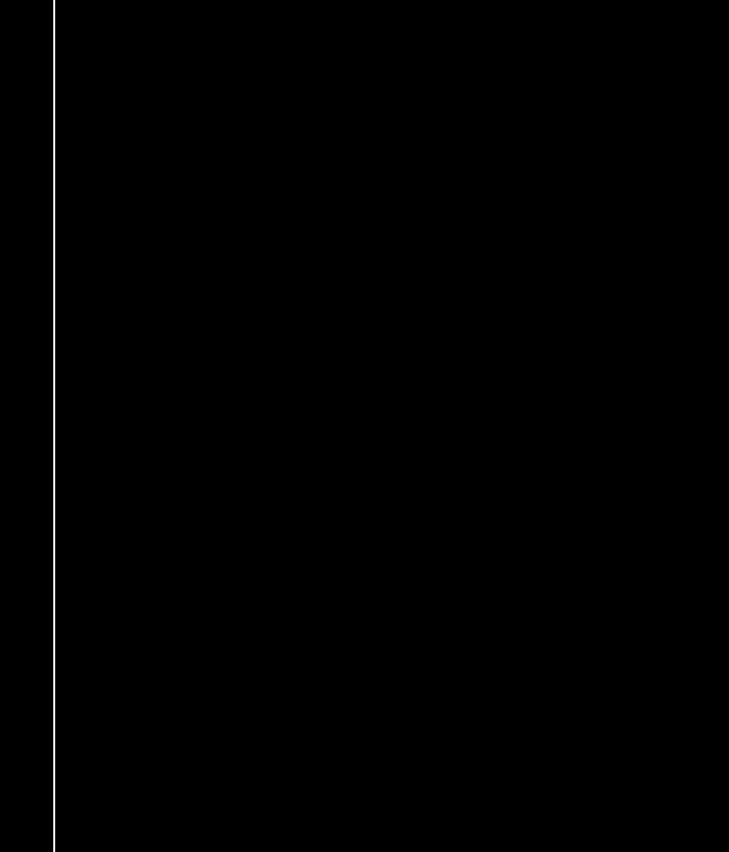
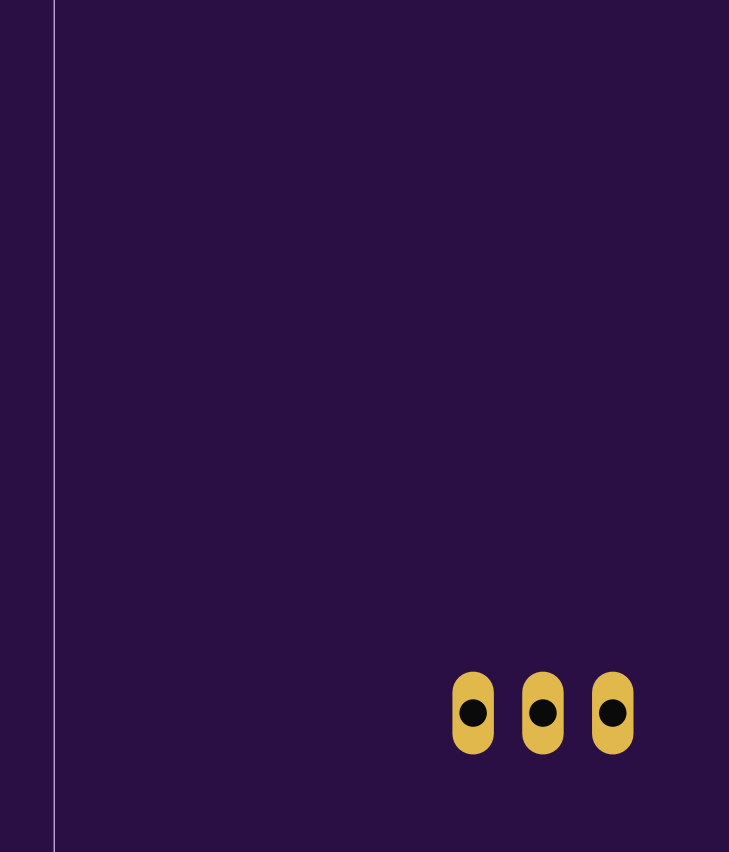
part: none -> (542, 713)

